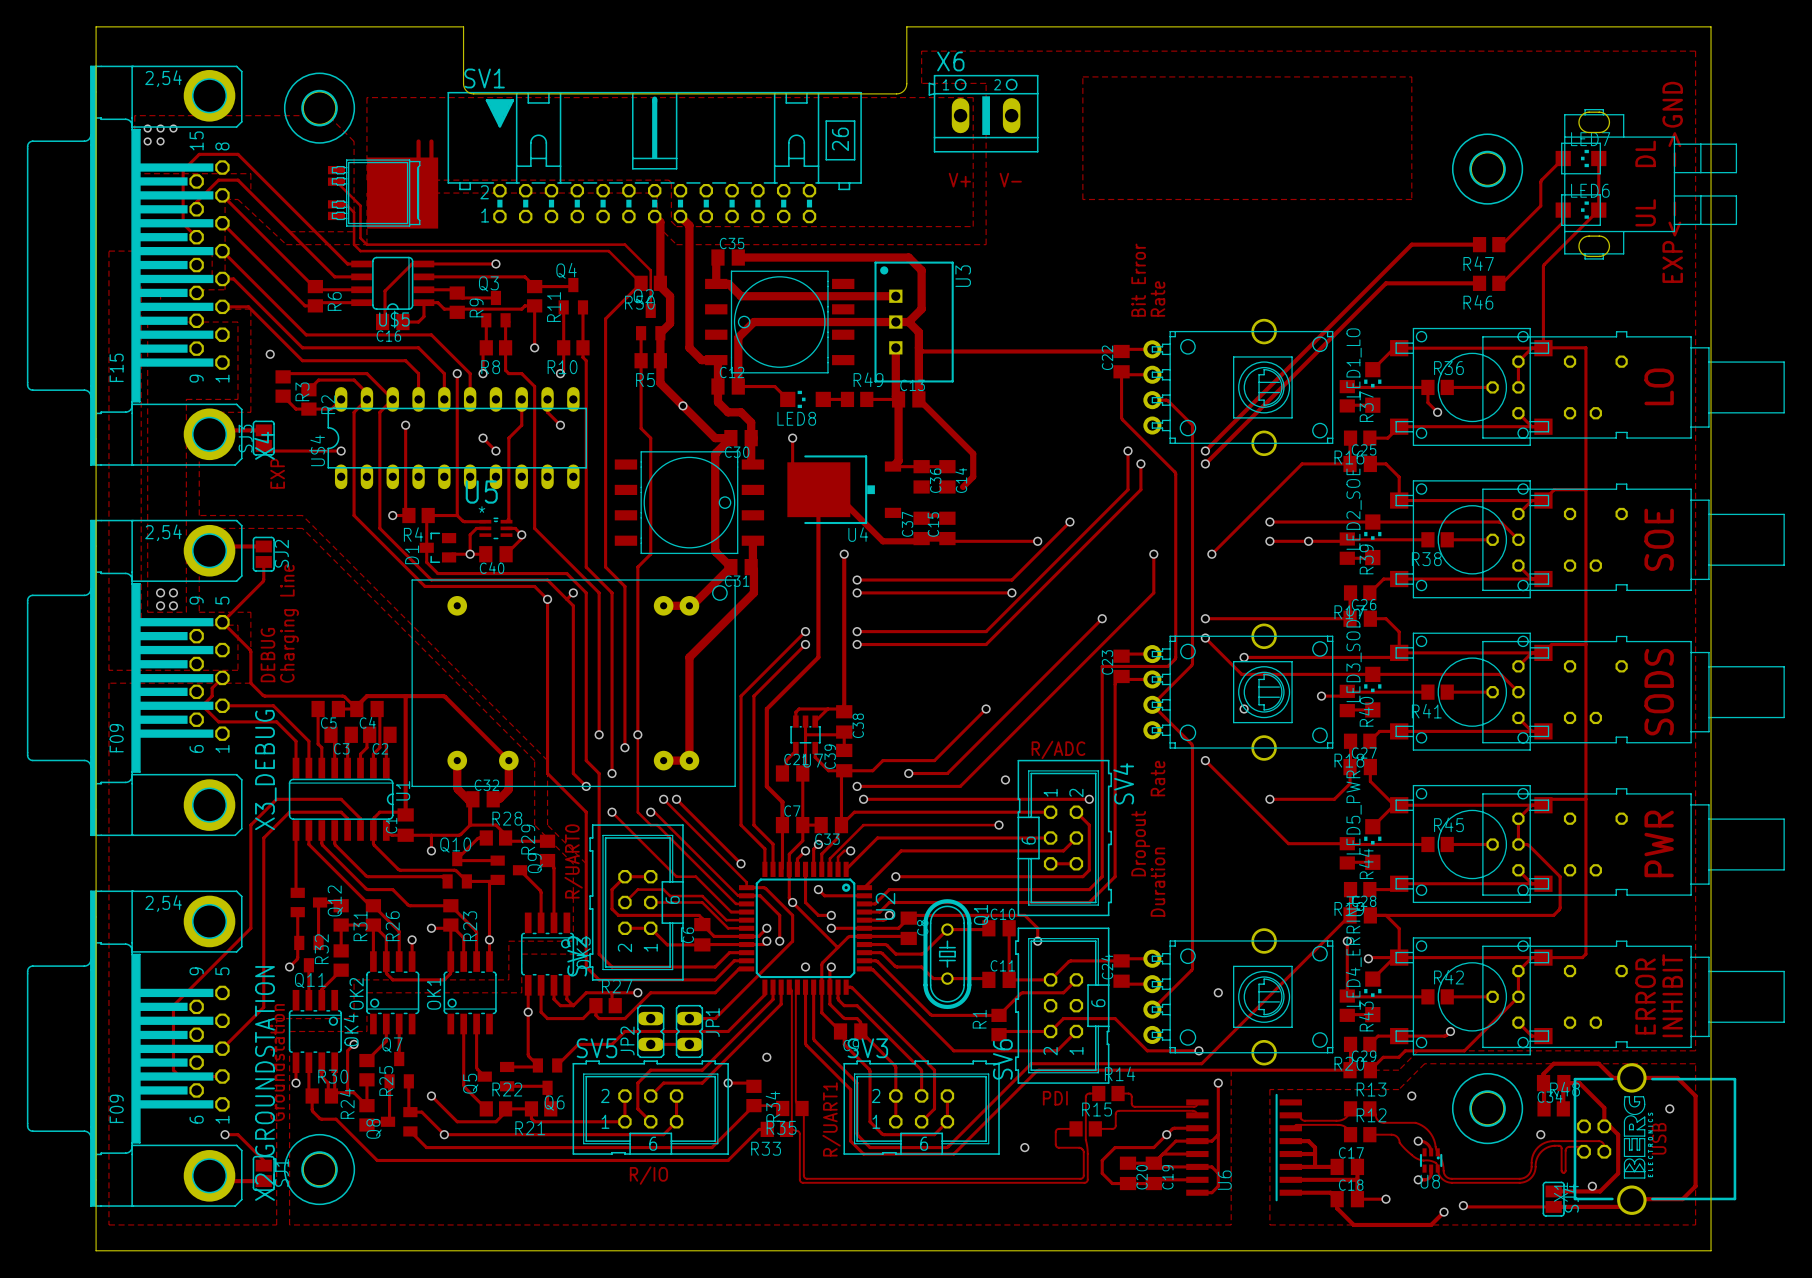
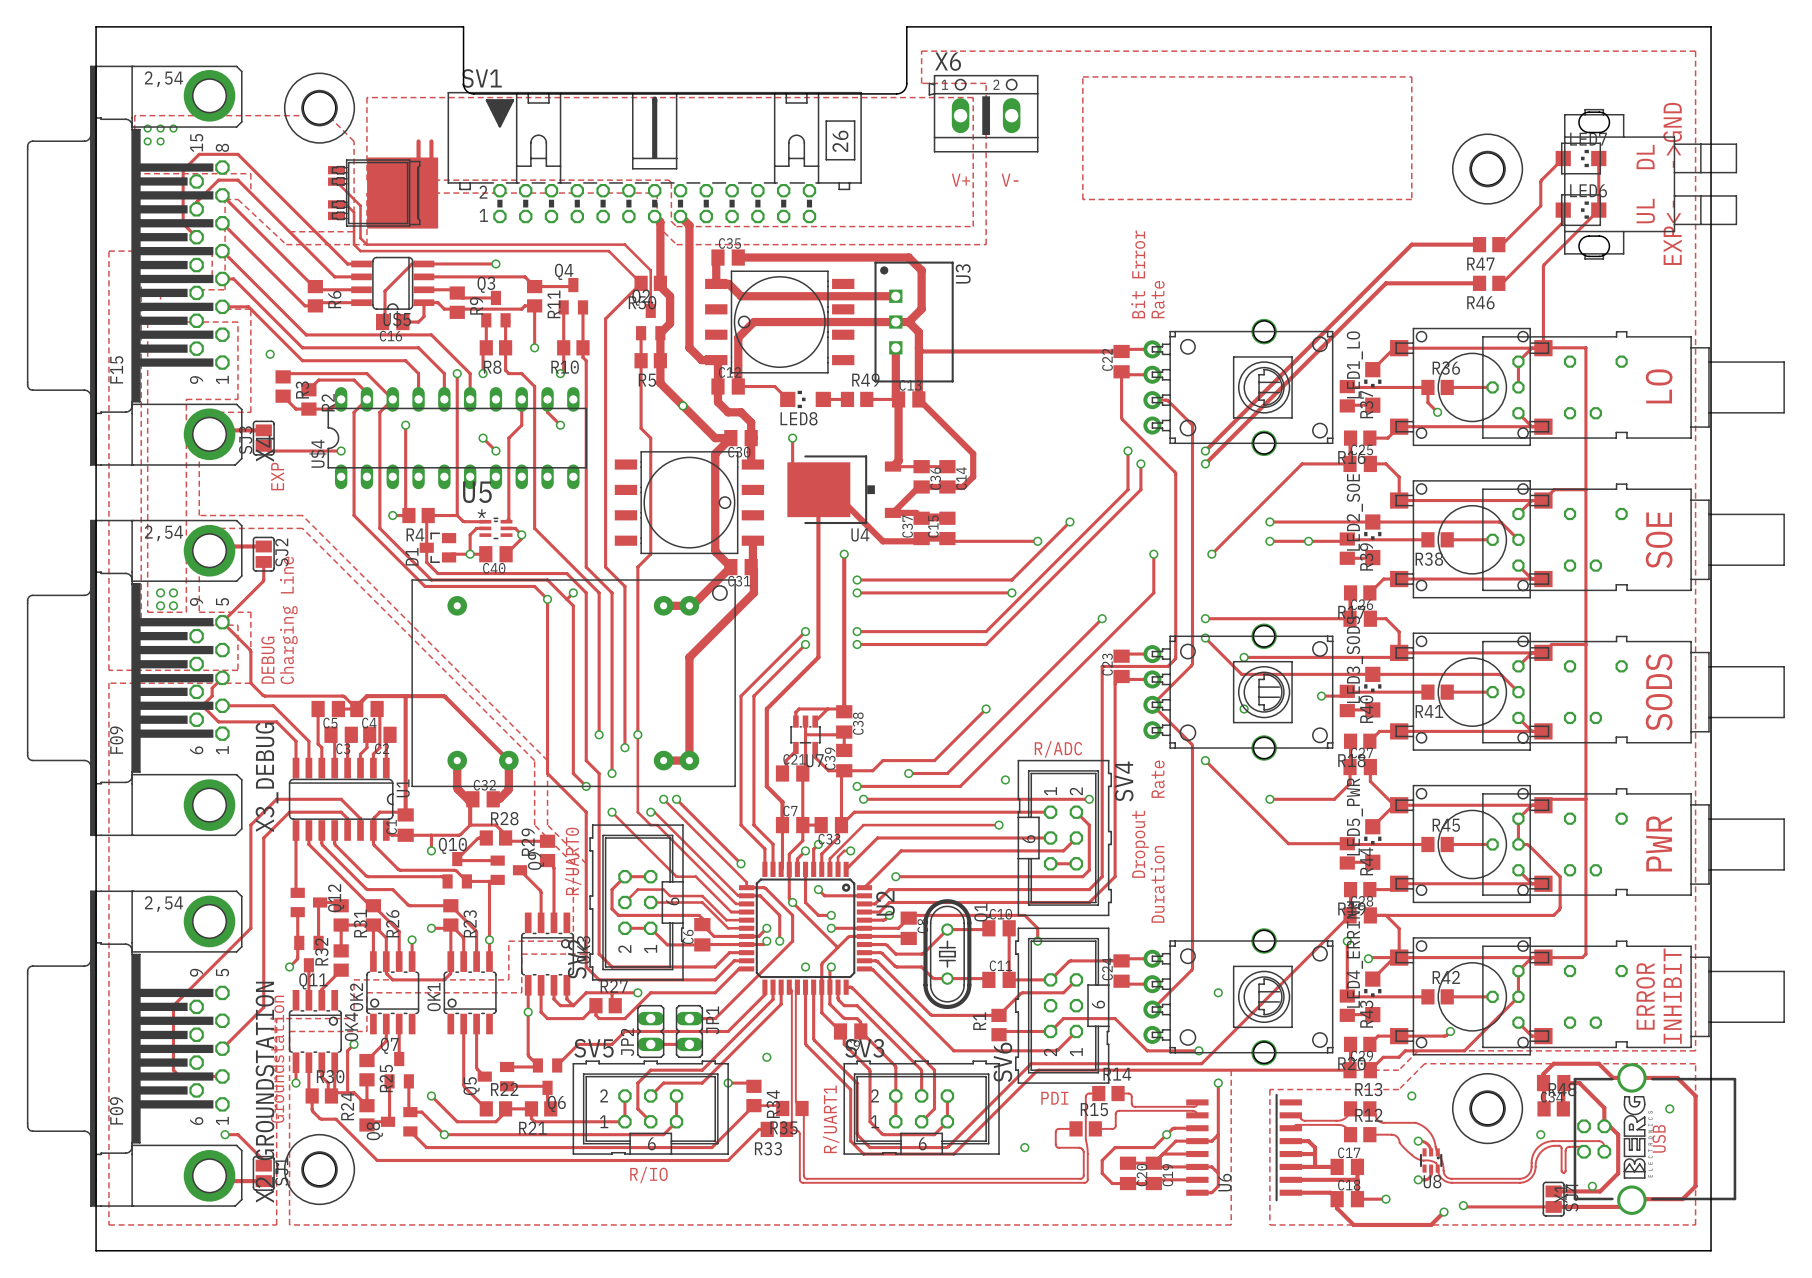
track: none -> (963, 486) (918, 486) (892, 512) (916, 512) (921, 518) (947, 518)

